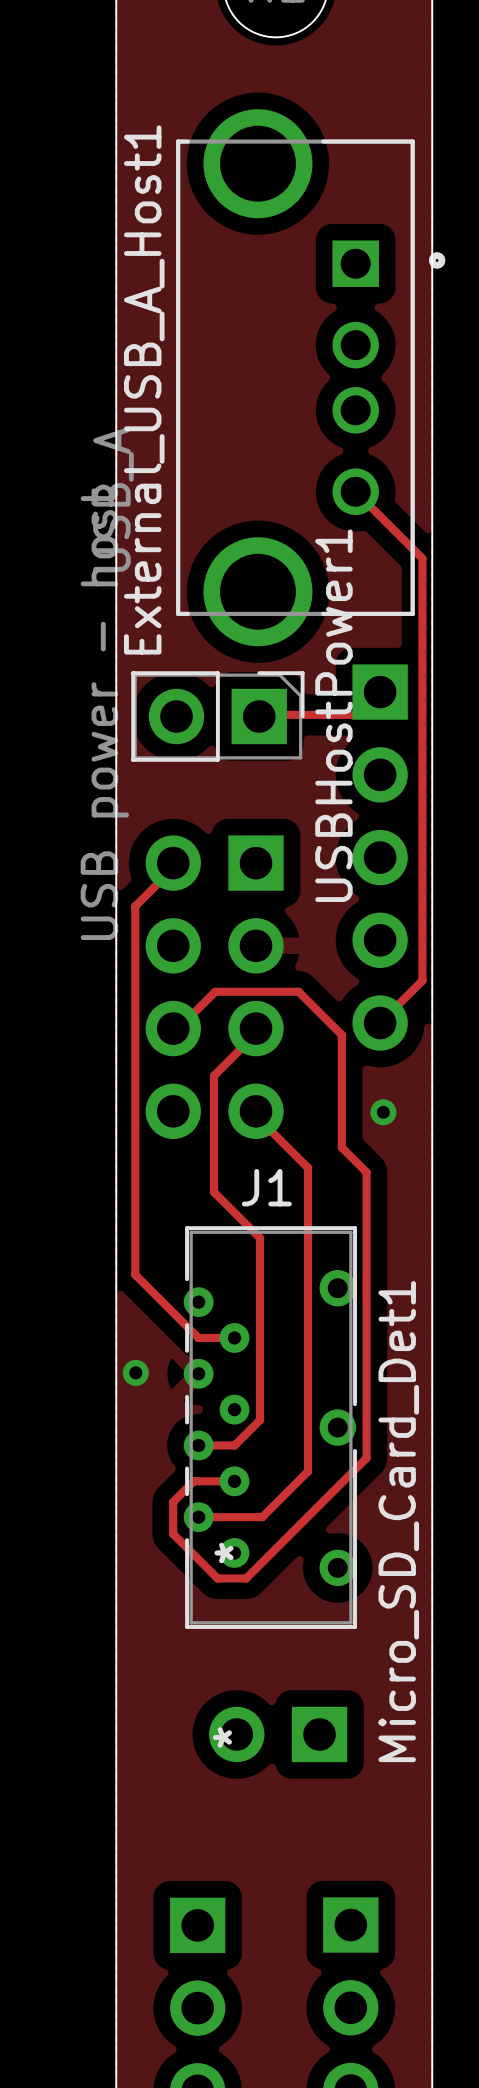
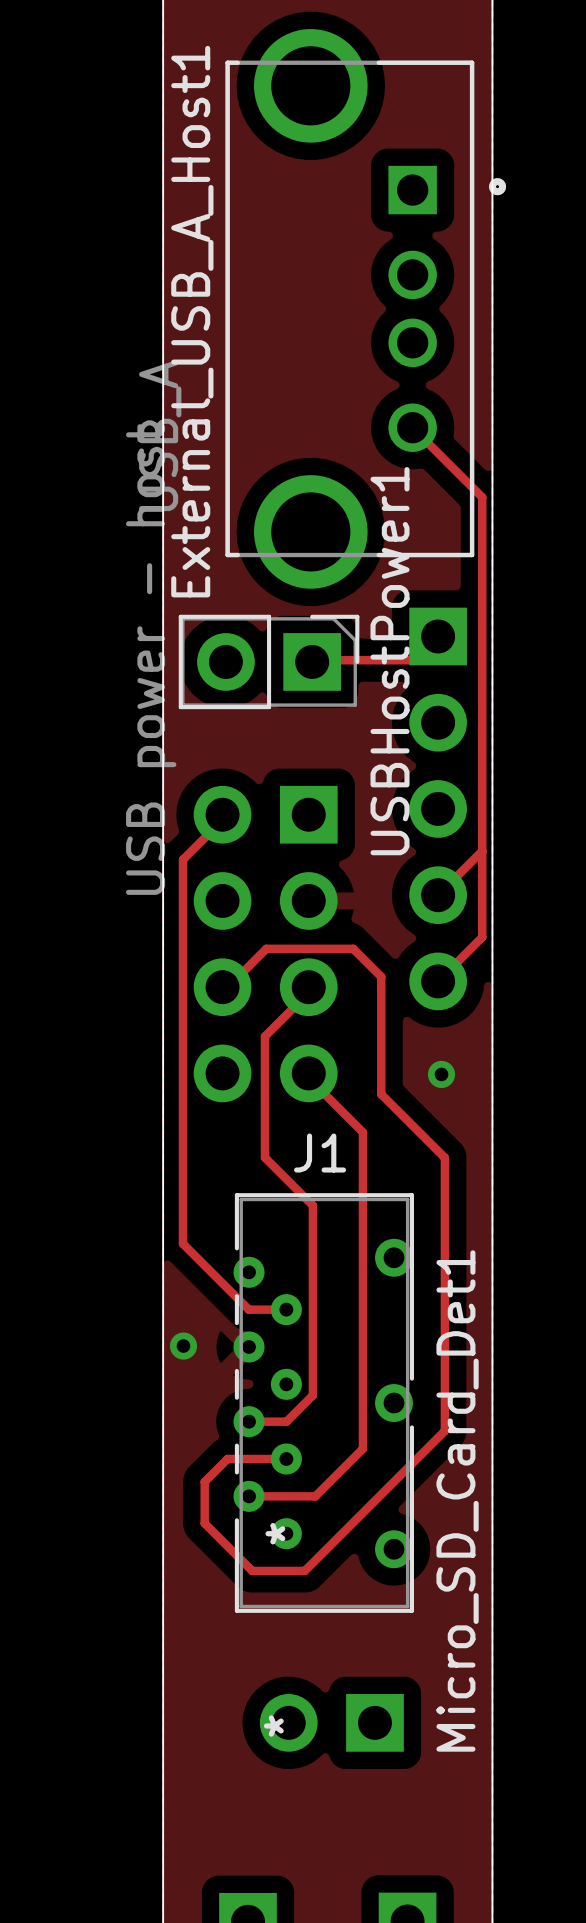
track: none -> (482, 851) (438, 895)
track: (325, 1018) (341, 1034) (341, 1147) -> (381, 976) (381, 1094) (398, 1111)
track: (366, 1172) (366, 1458) (246, 1578) (217, 1578) (173, 1534) (173, 1501) (193, 1481) -> (423, 1136) (444, 1157) (444, 1430) (304, 1570) (252, 1570) (204, 1523) (204, 1481) (227, 1459) (244, 1459)

